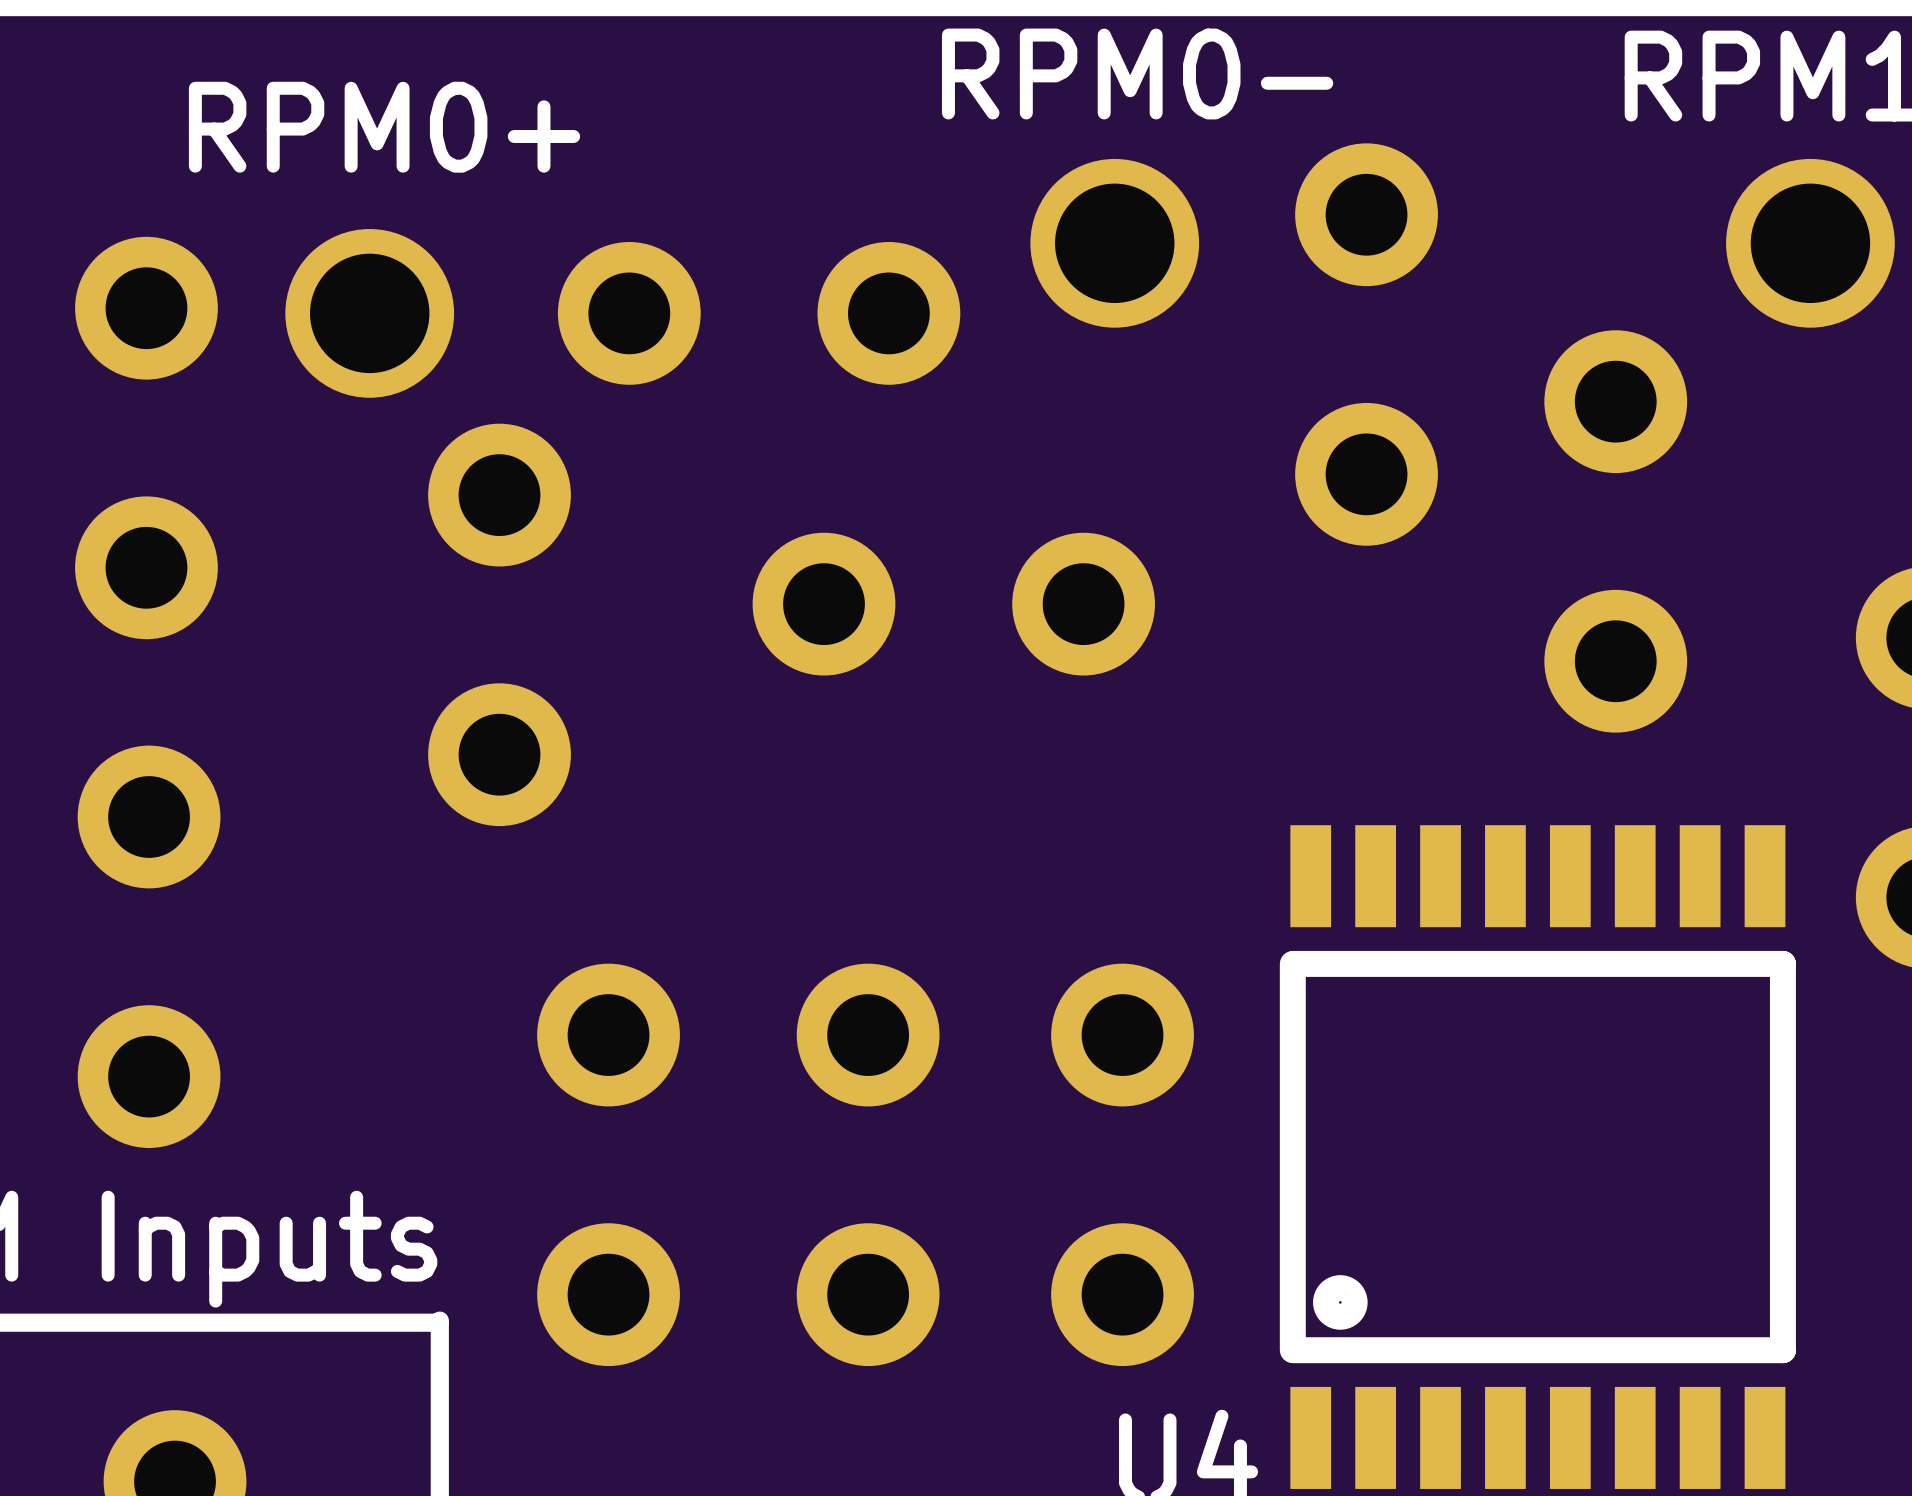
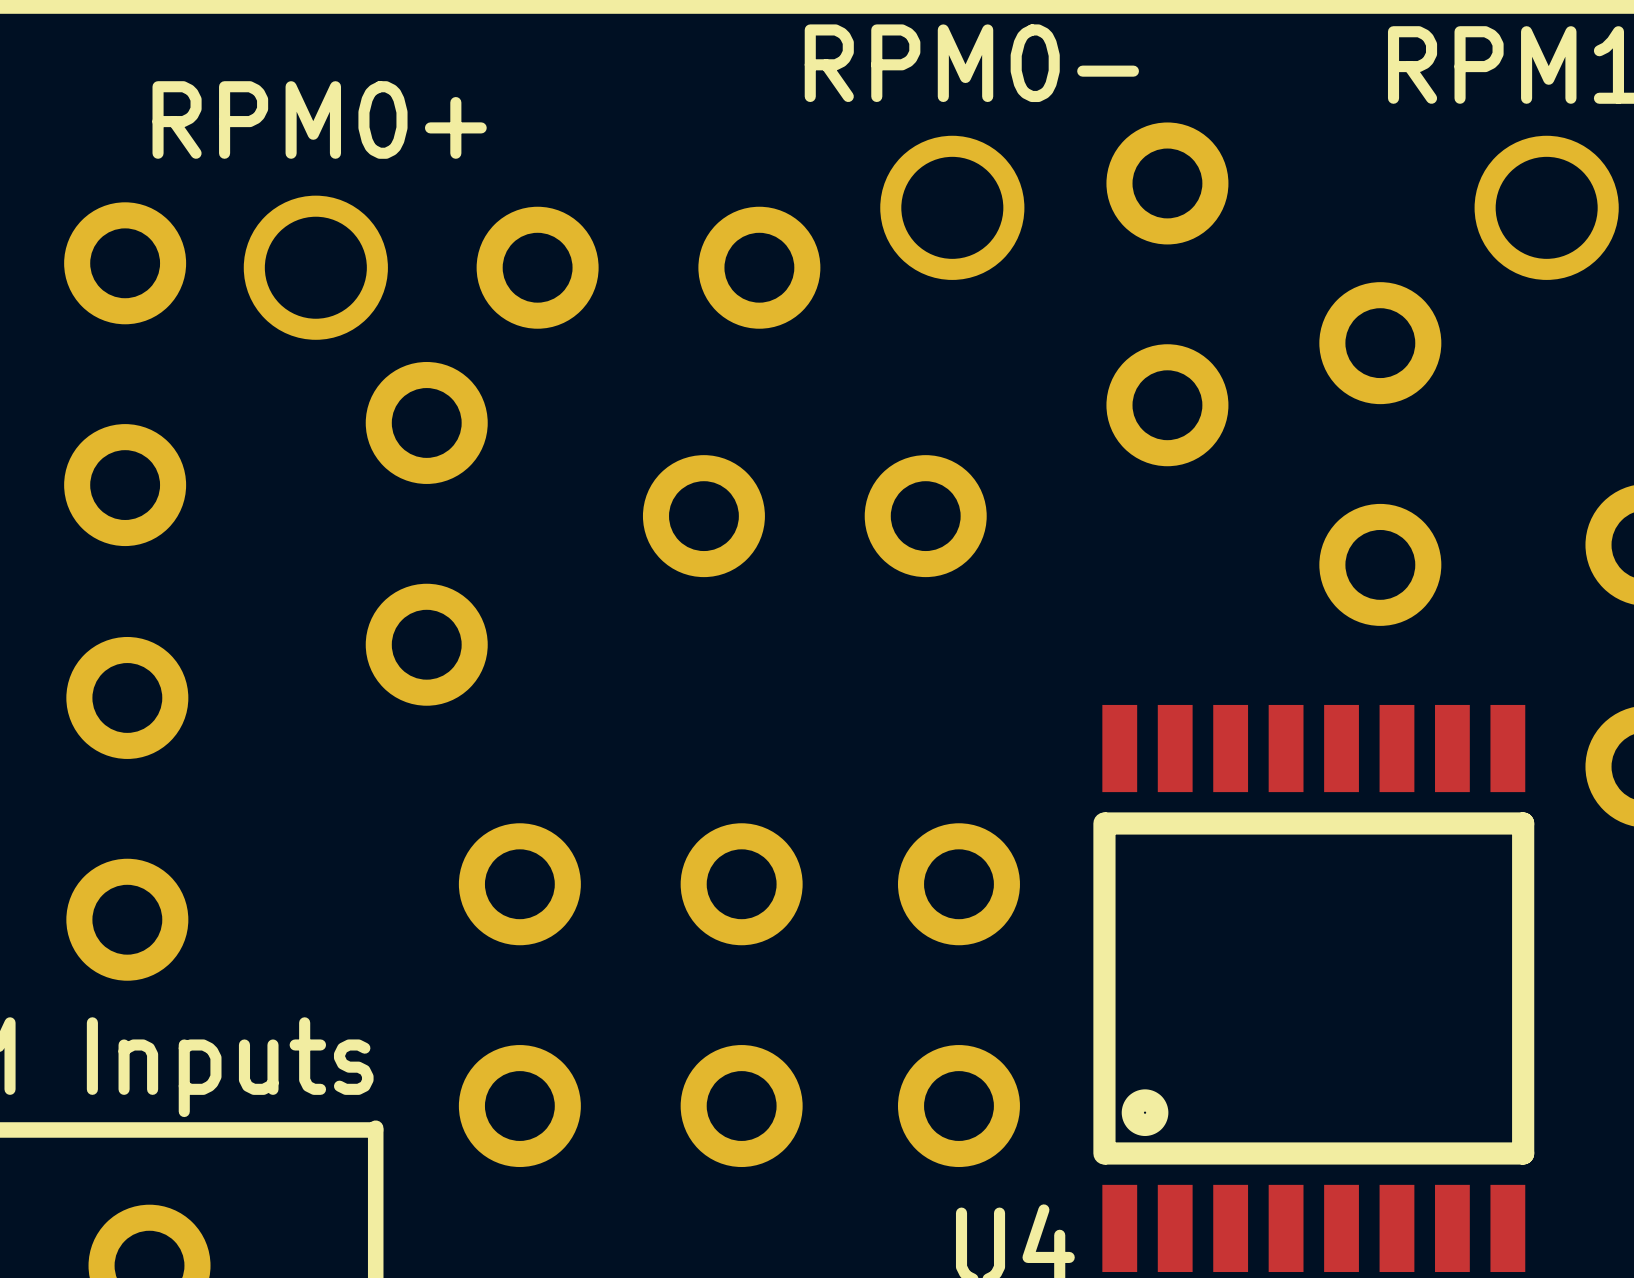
text position: RPM0+ (384, 127) -> RPM0+ (319, 119)

